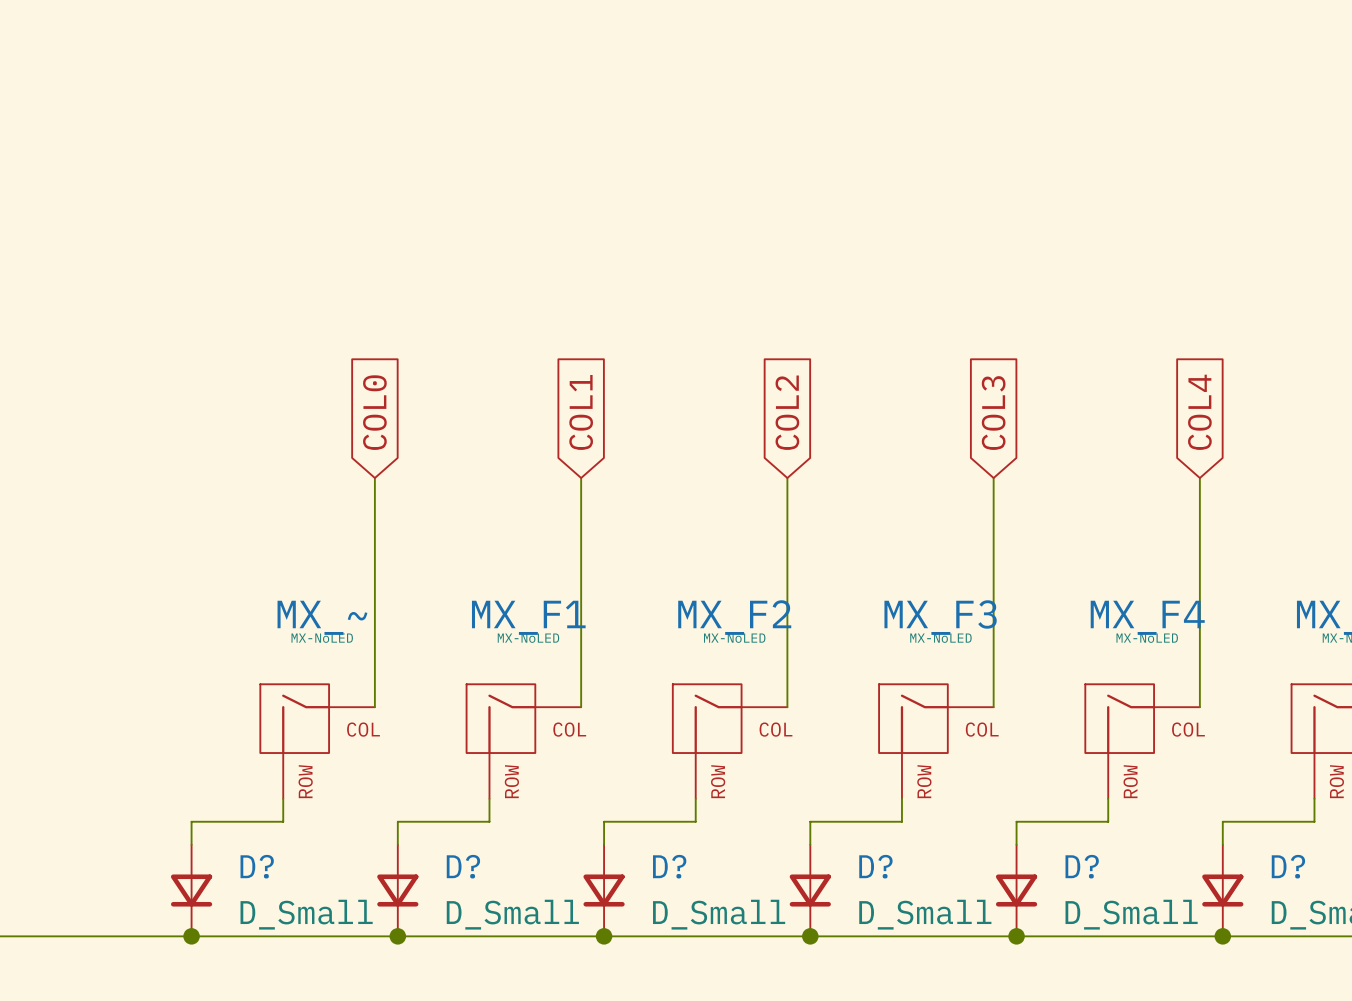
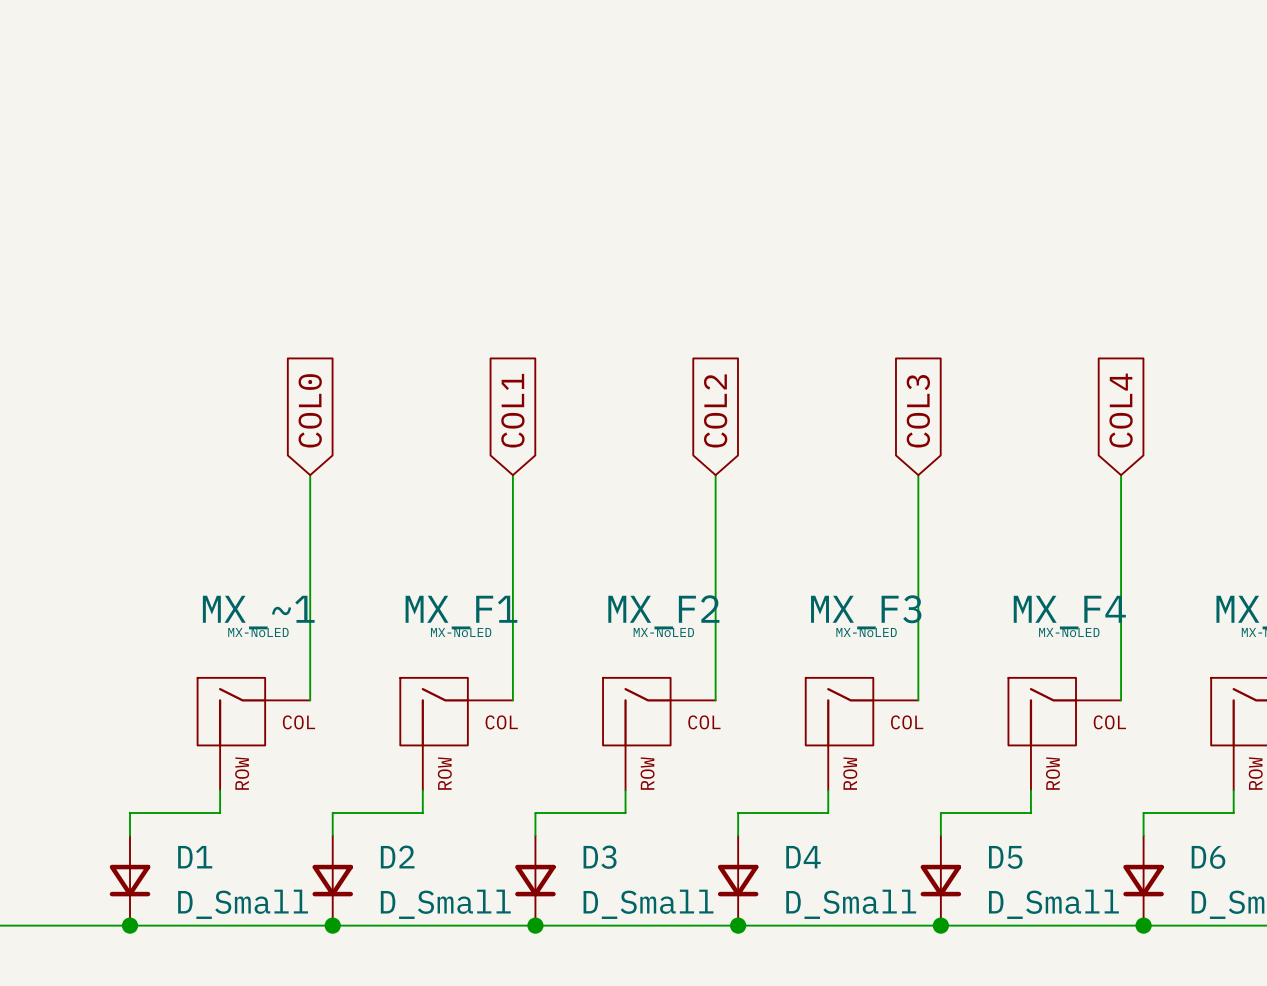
MX_~ name: MX_~ (322, 617) -> MX_~1 (258, 612)
D? name: D? (257, 866) -> D1 (195, 857)
D? name: D? (463, 866) -> D2 (397, 857)
D? name: D? (669, 866) -> D3 (600, 857)
D? name: D? (875, 866) -> D4 (803, 857)
D? name: D? (1082, 866) -> D5 (1005, 857)
D? name: D? (1288, 866) -> D6 (1208, 857)

